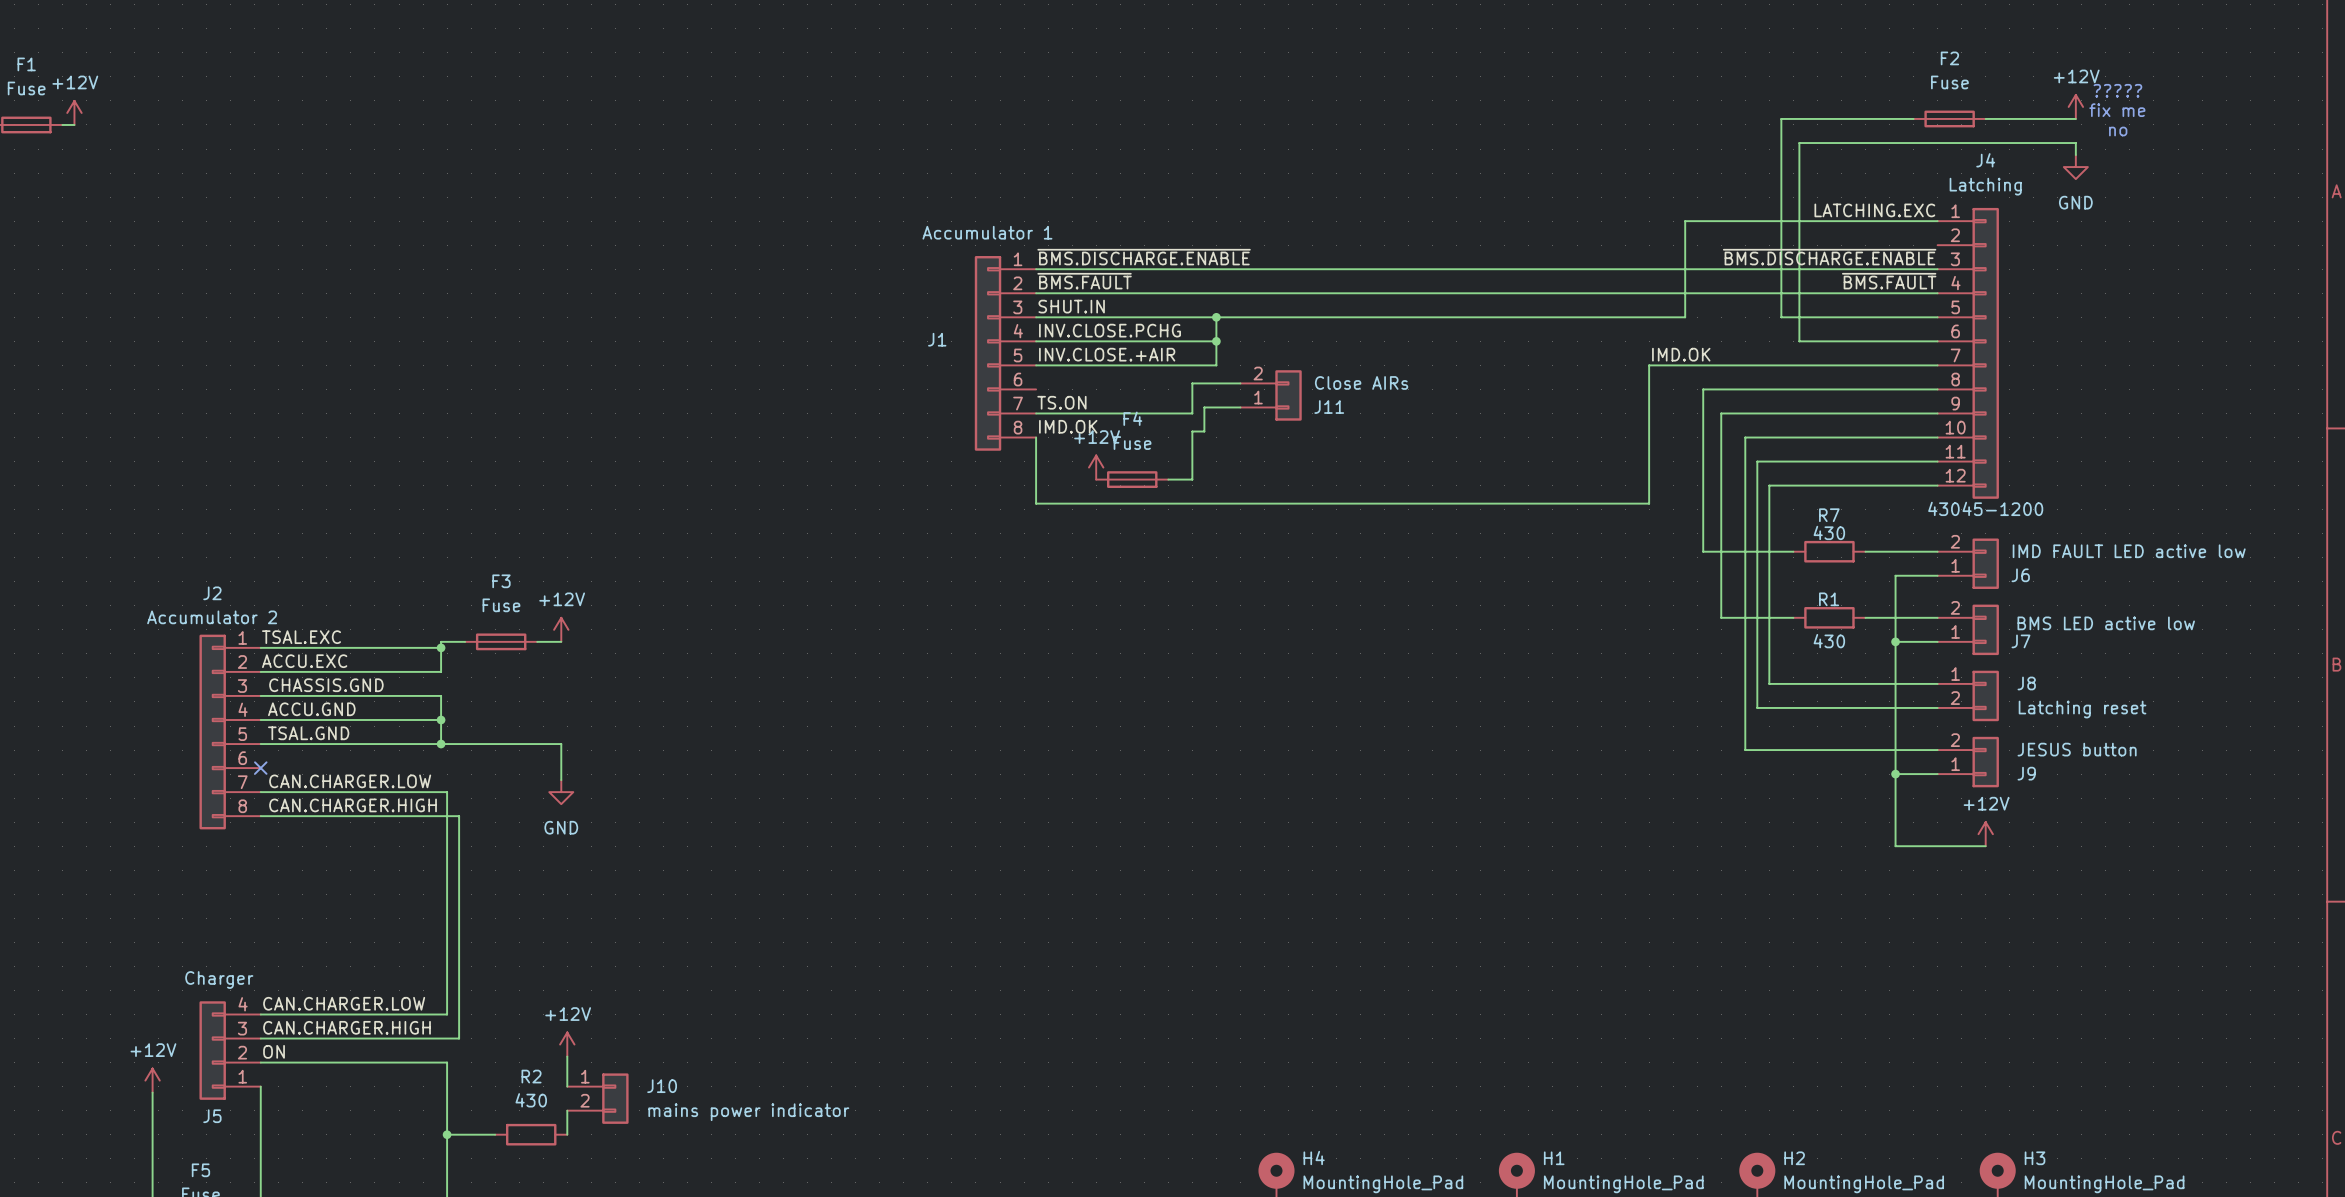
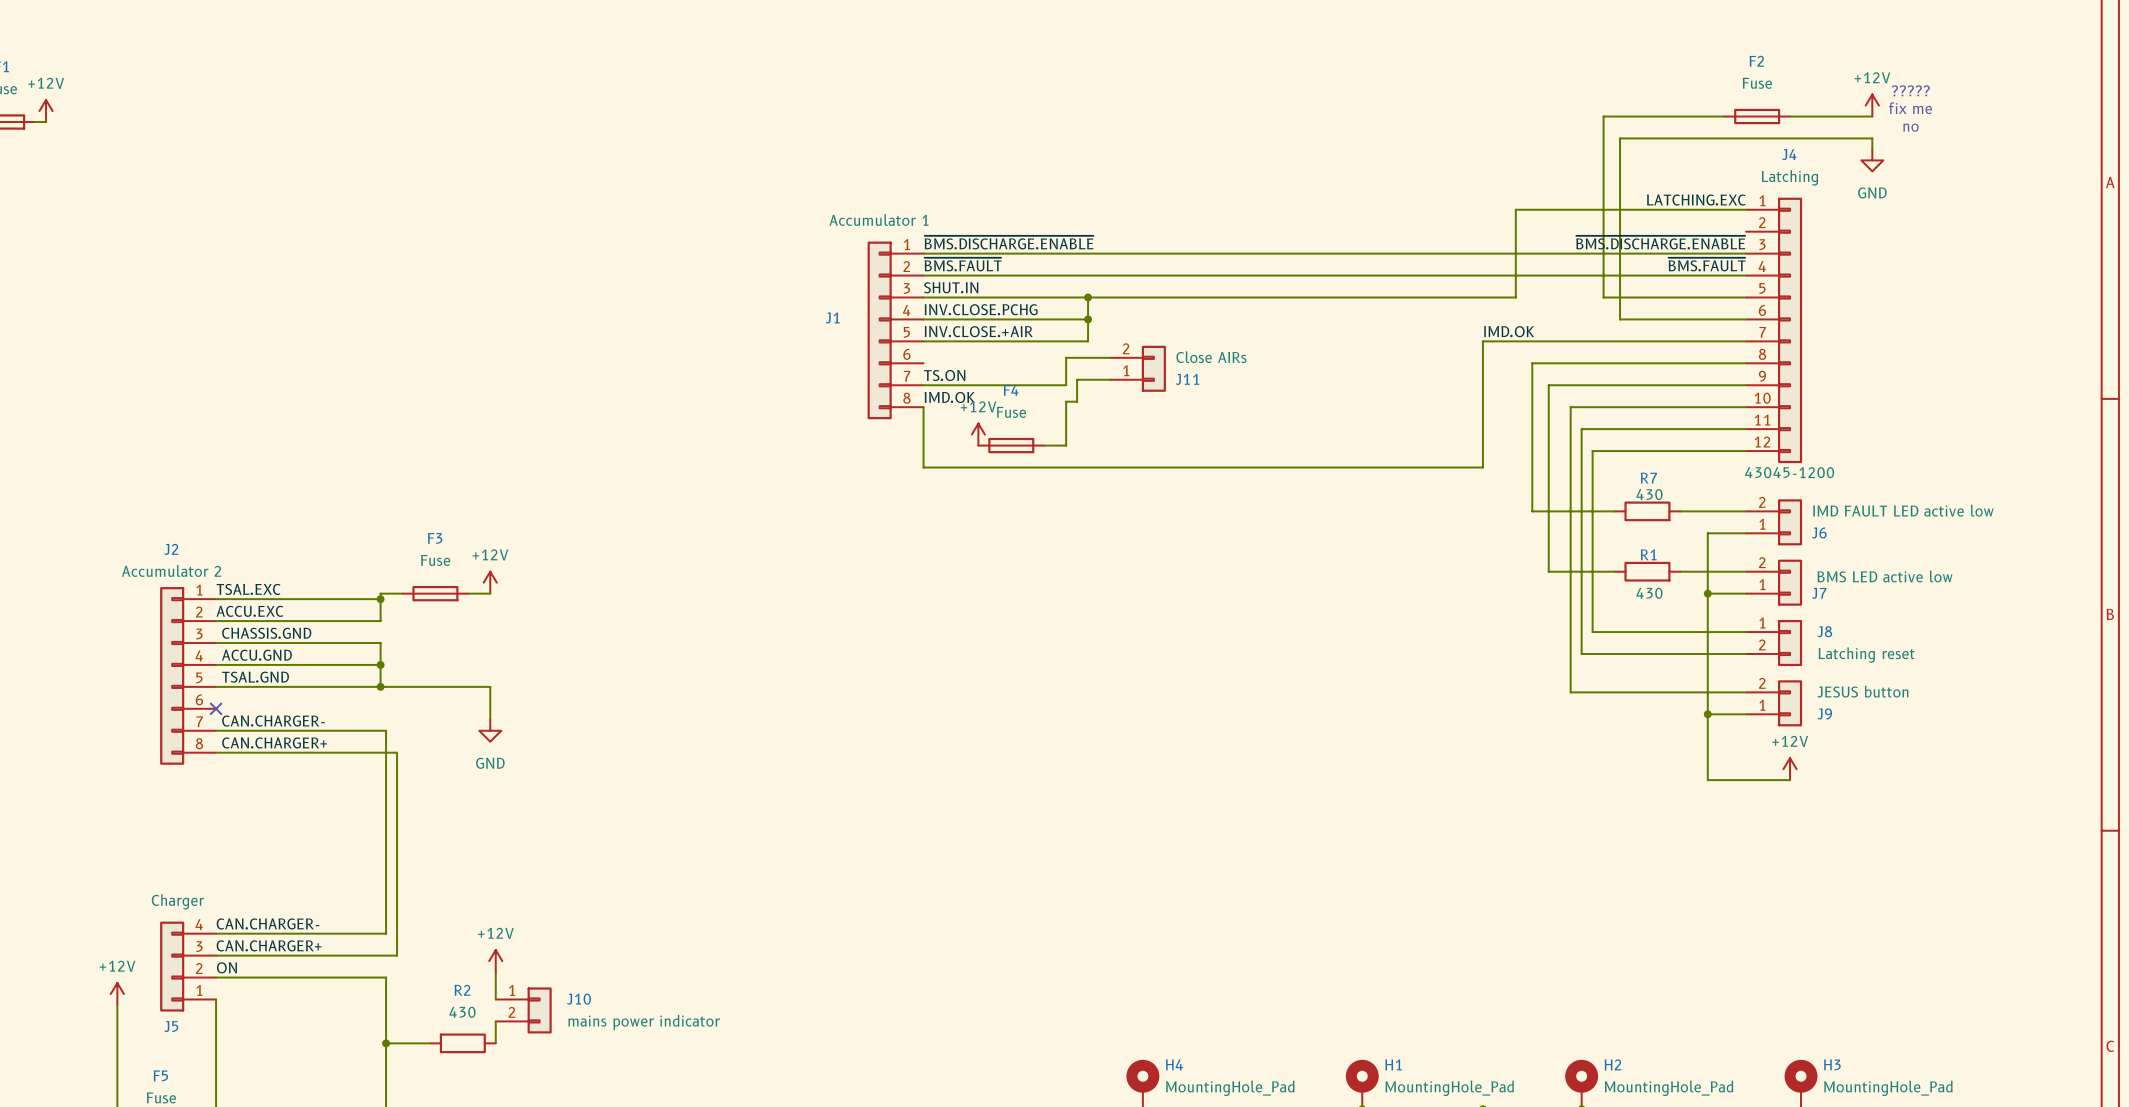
label: CAN.CHARGER.LOW (350, 781) -> CAN.CHARGER- (273, 721)
label: CAN.CHARGER.HIGH (353, 805) -> CAN.CHARGER+ (274, 742)
label: CAN.CHARGER.LOW (344, 1003) -> CAN.CHARGER- (267, 923)
label: CAN.CHARGER.HIGH (347, 1027) -> CAN.CHARGER+ (269, 945)

